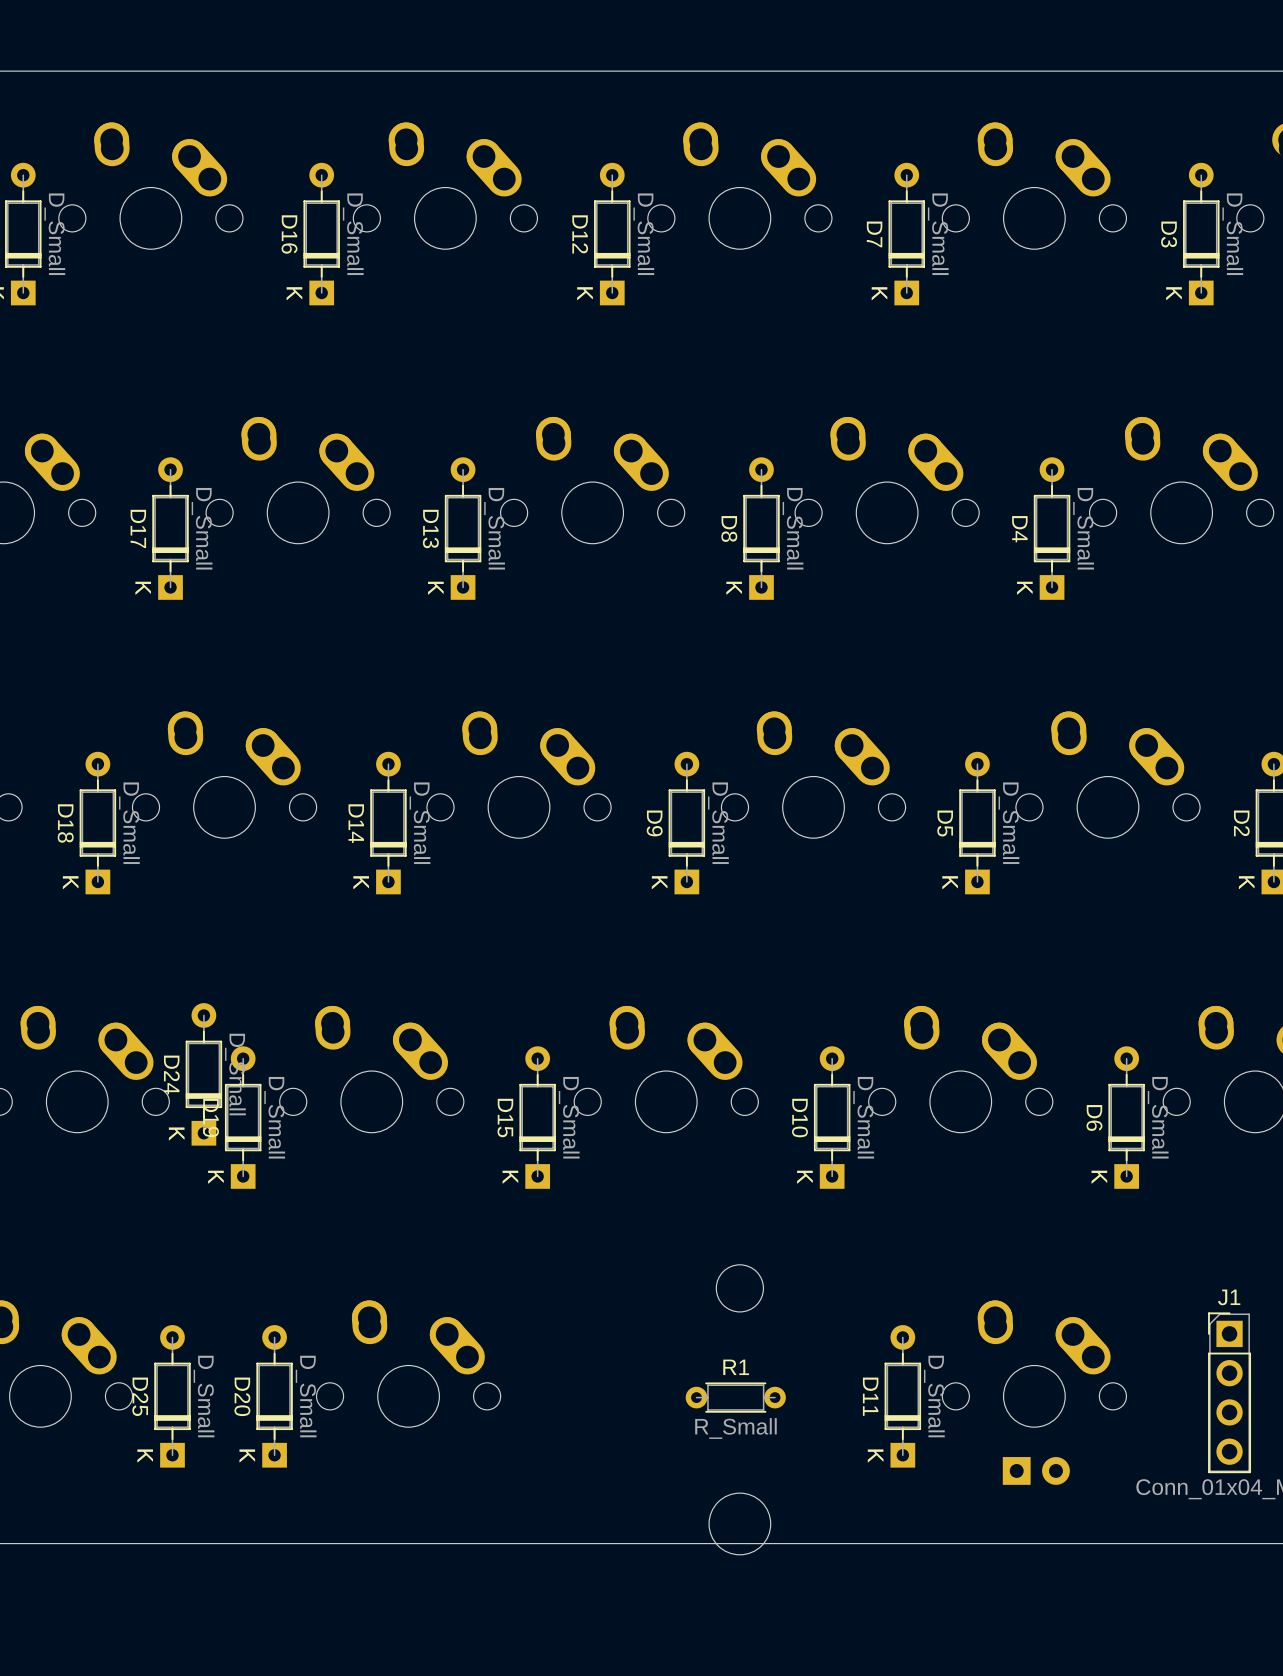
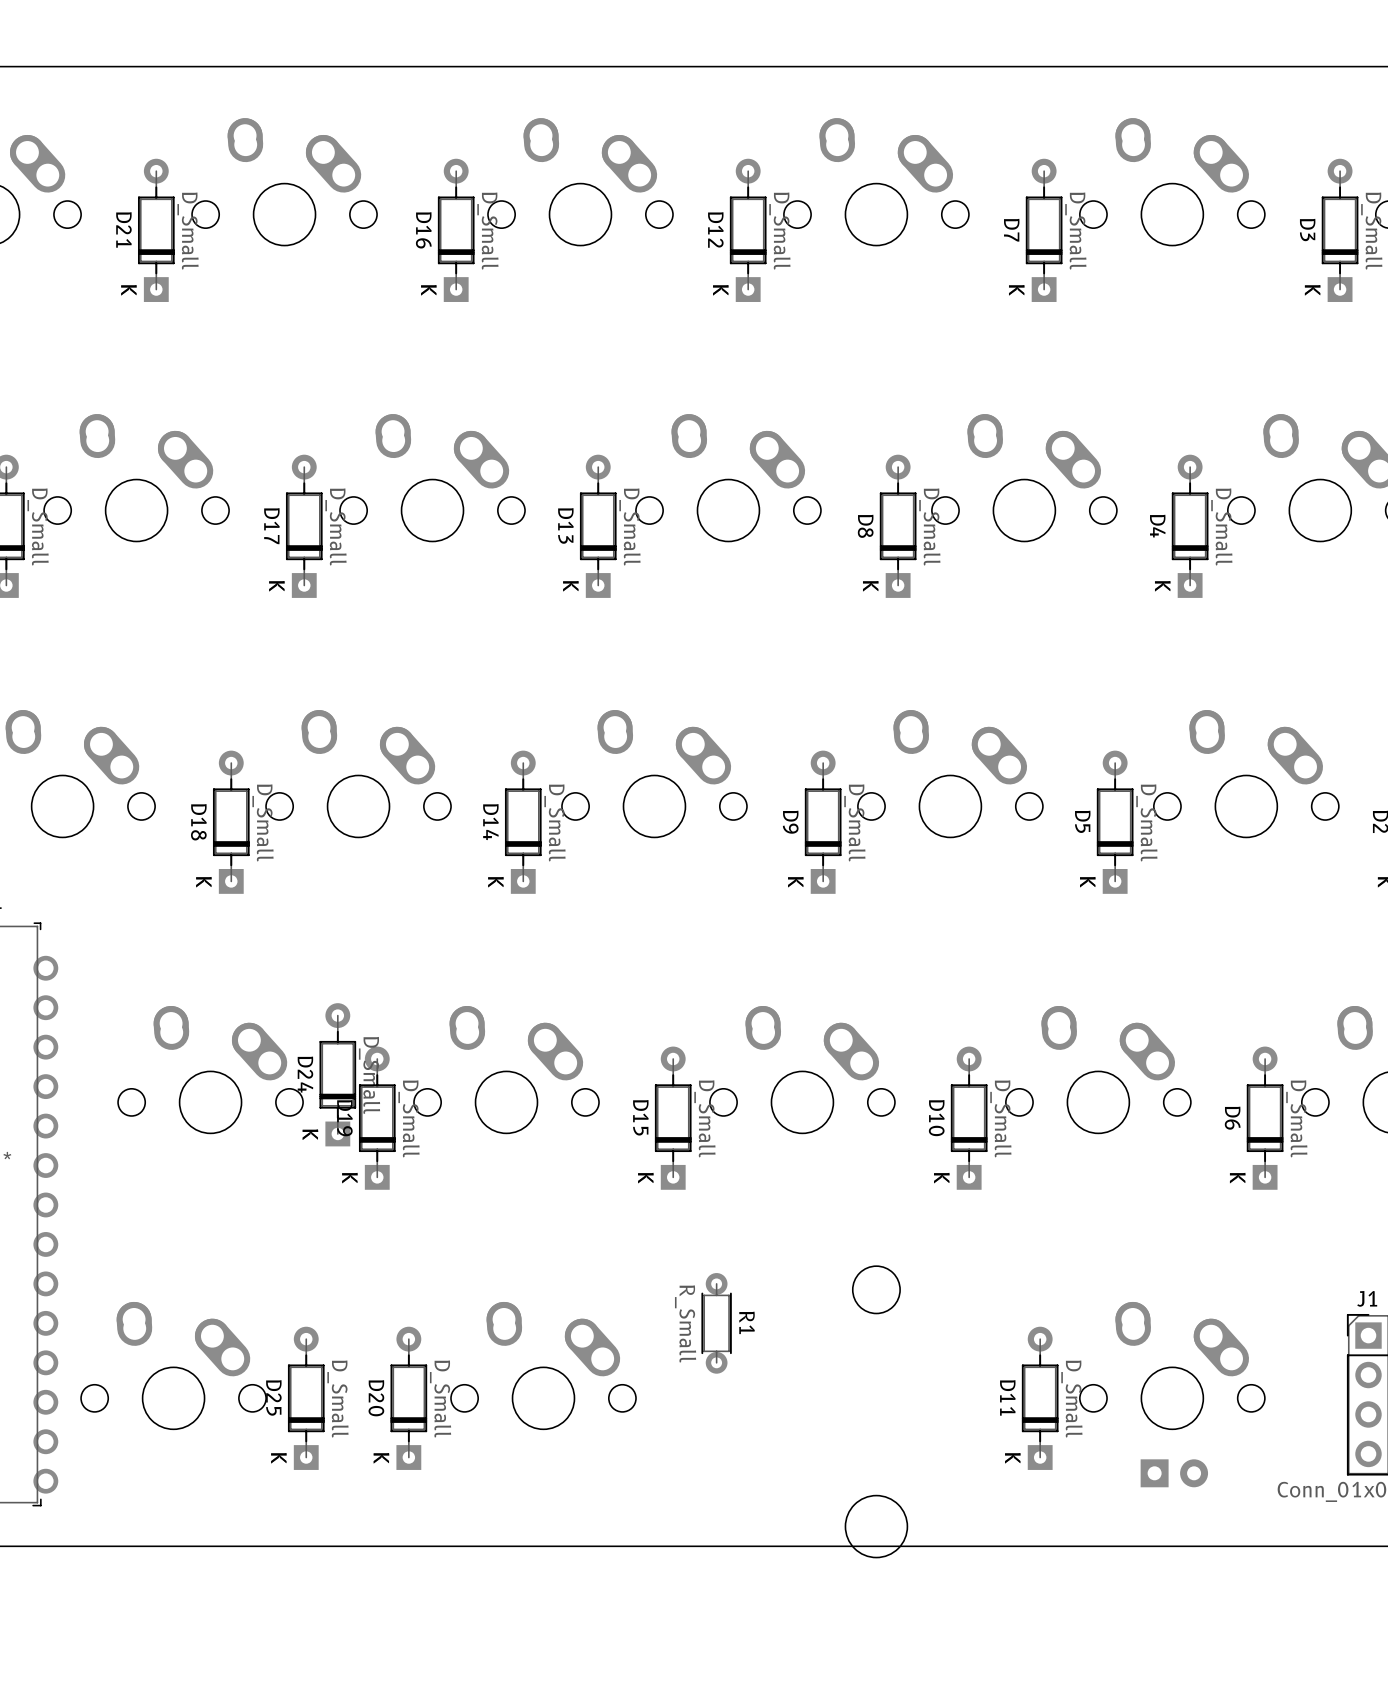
R1 rotation: 0° (735, 1397) -> 90° clockwise (716, 1323)
R1 position: (735, 1397) -> (716, 1323)

